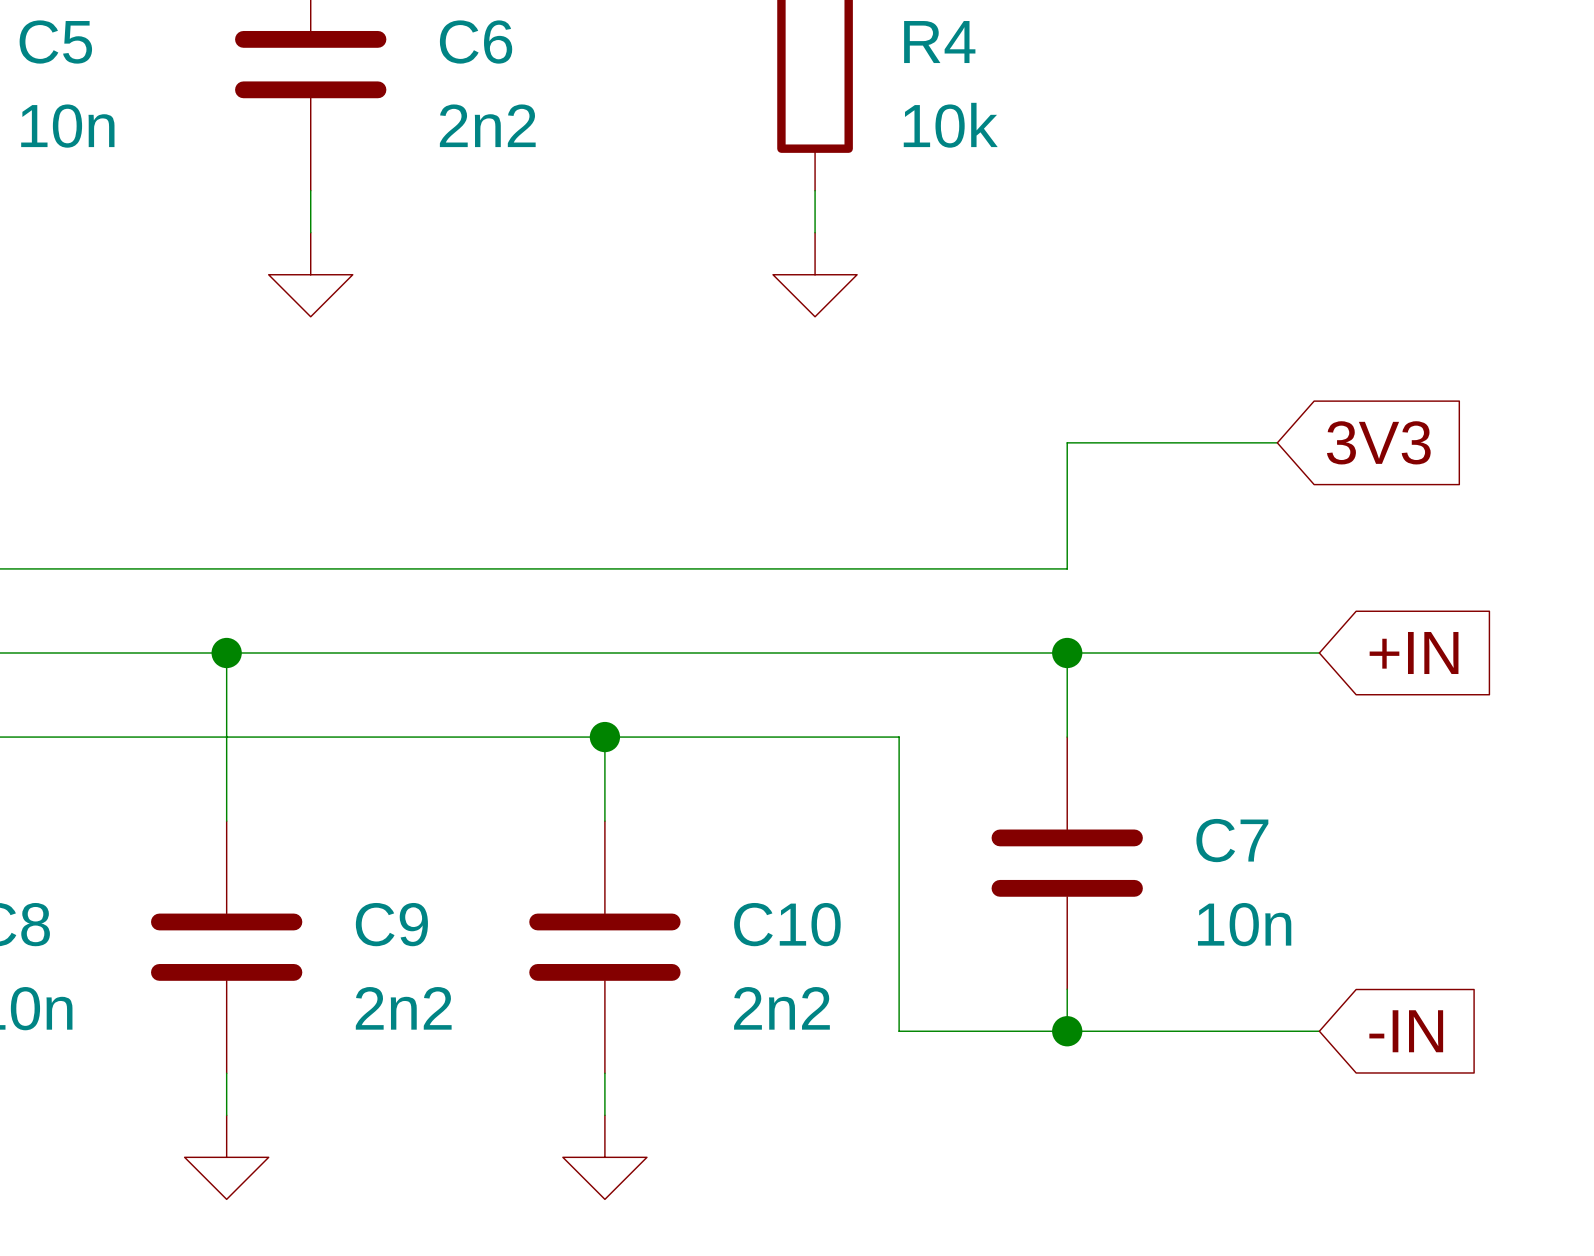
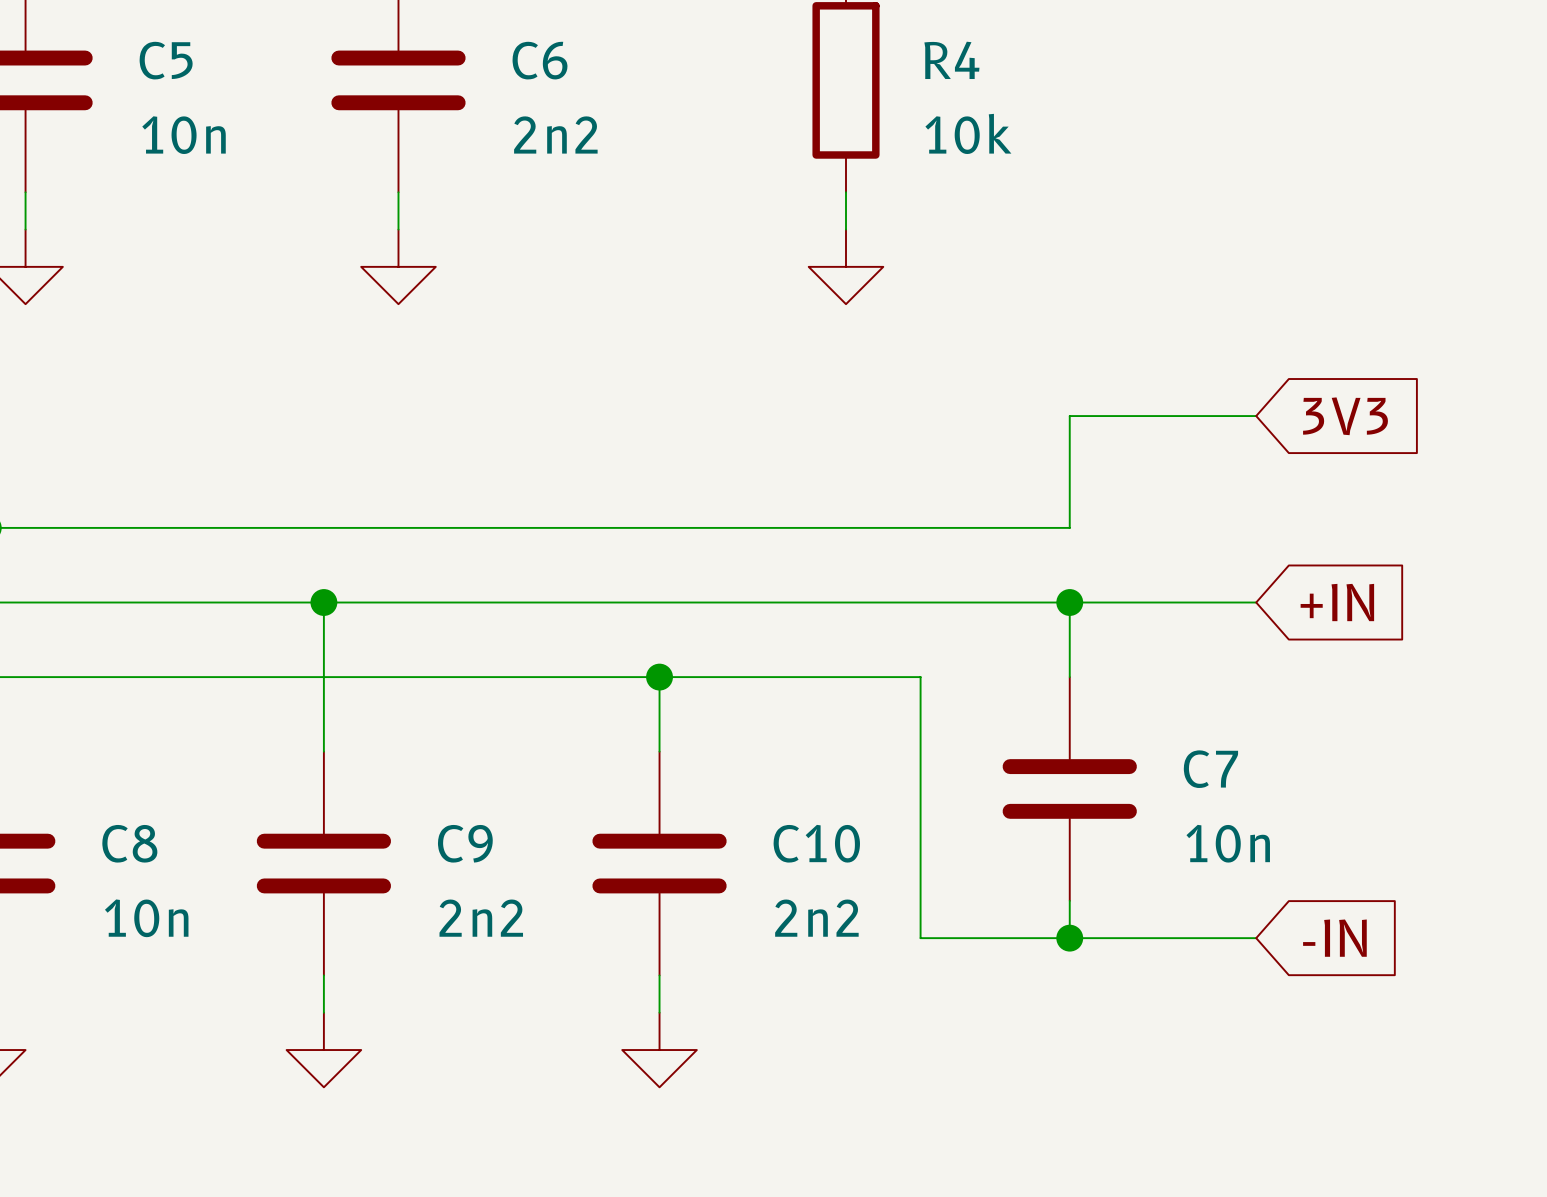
wire: (1277, 653) (1319, 653) -> none
global label position: +IN (1414, 653) -> +IN (1337, 602)
wire: (1277, 1031) (1319, 1031) -> none
global label position: -IN (1406, 1031) -> -IN (1334, 938)

